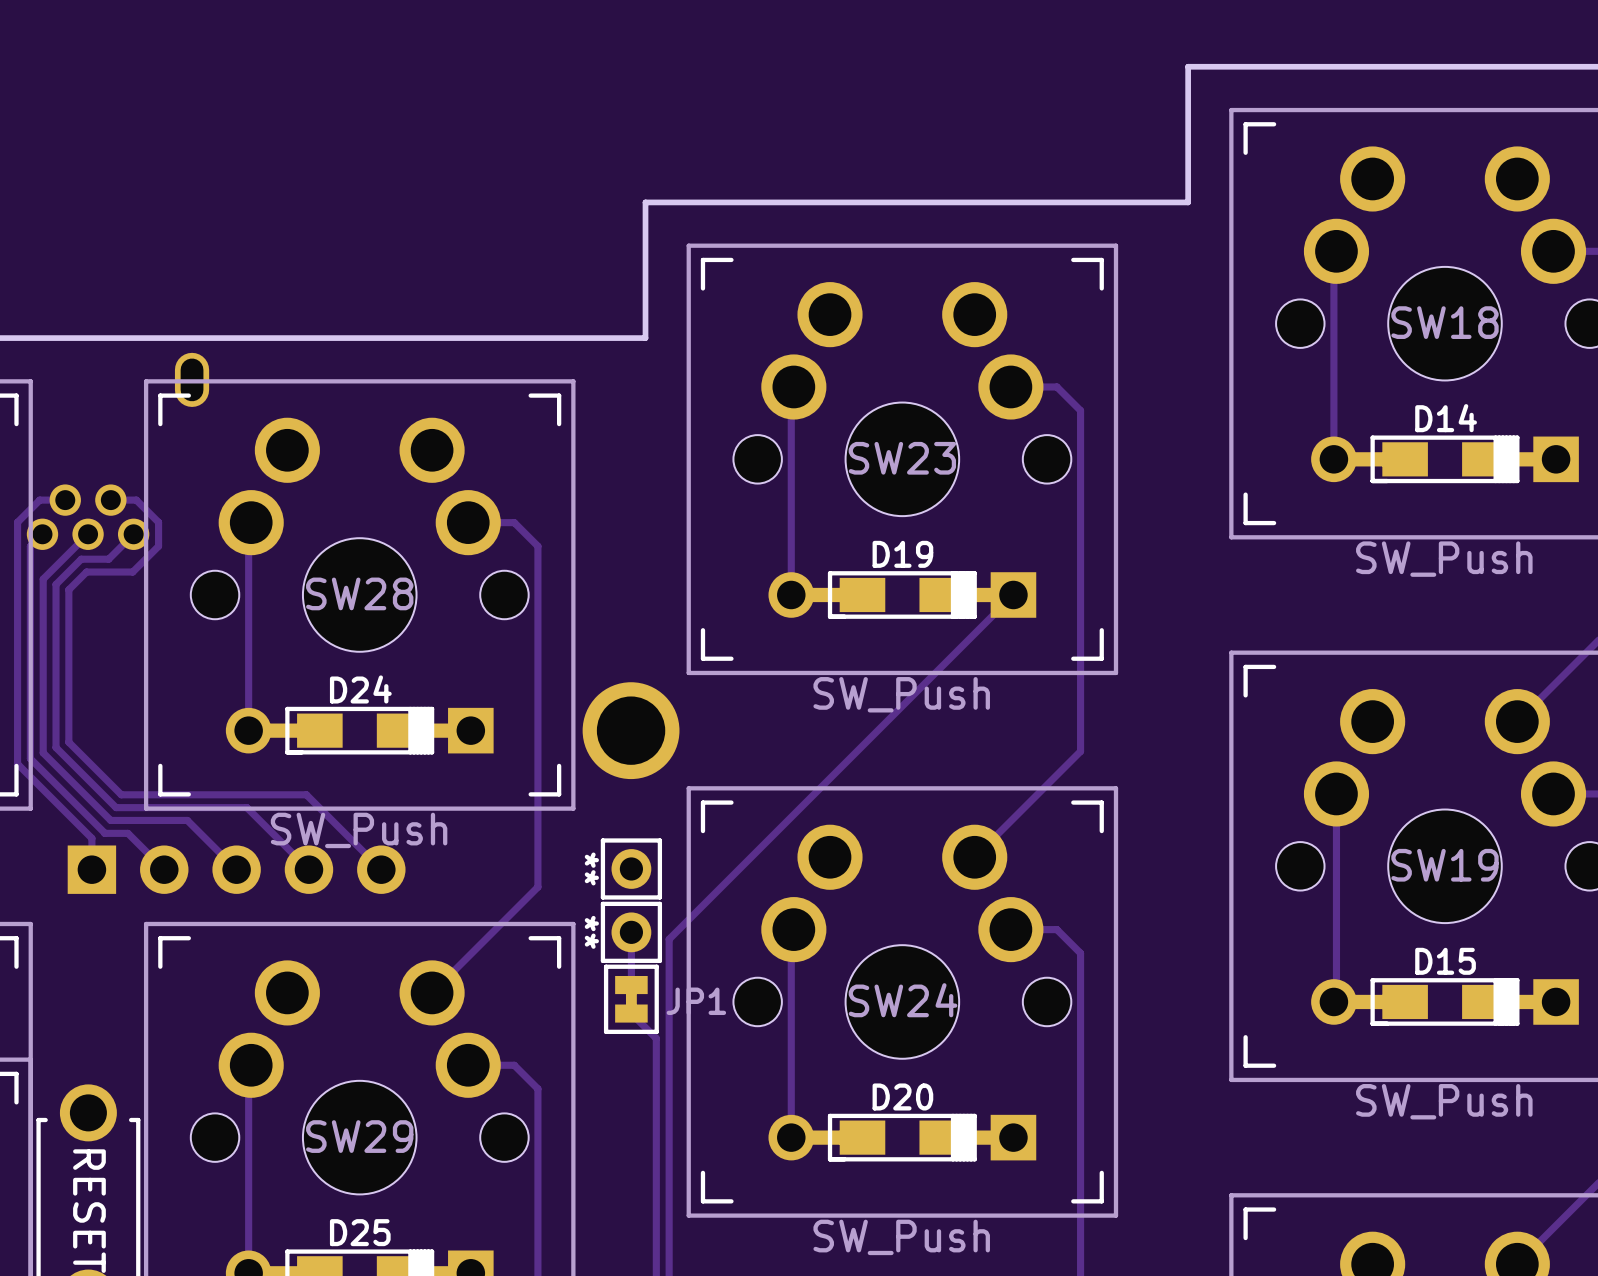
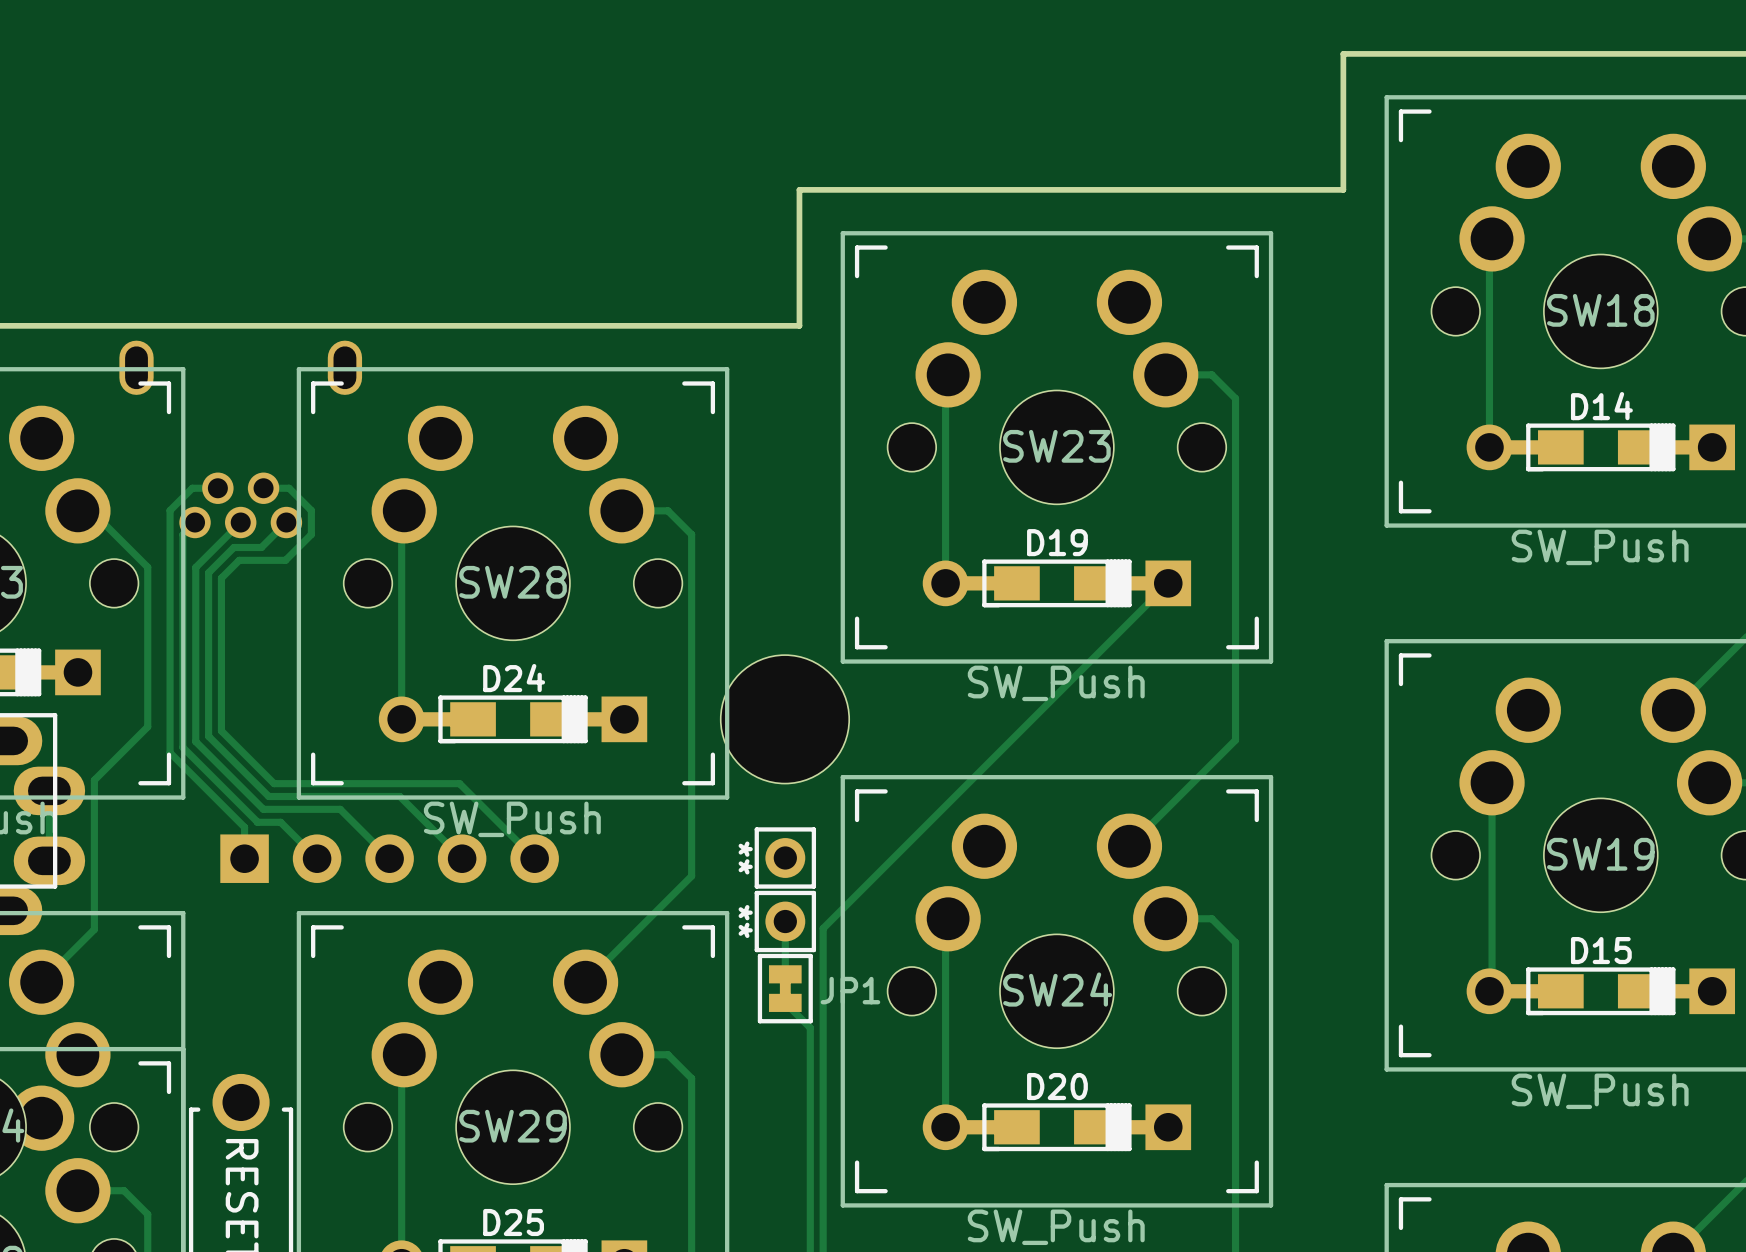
part footprint: [582, 682, 680, 780] -> [720, 655, 850, 784]

